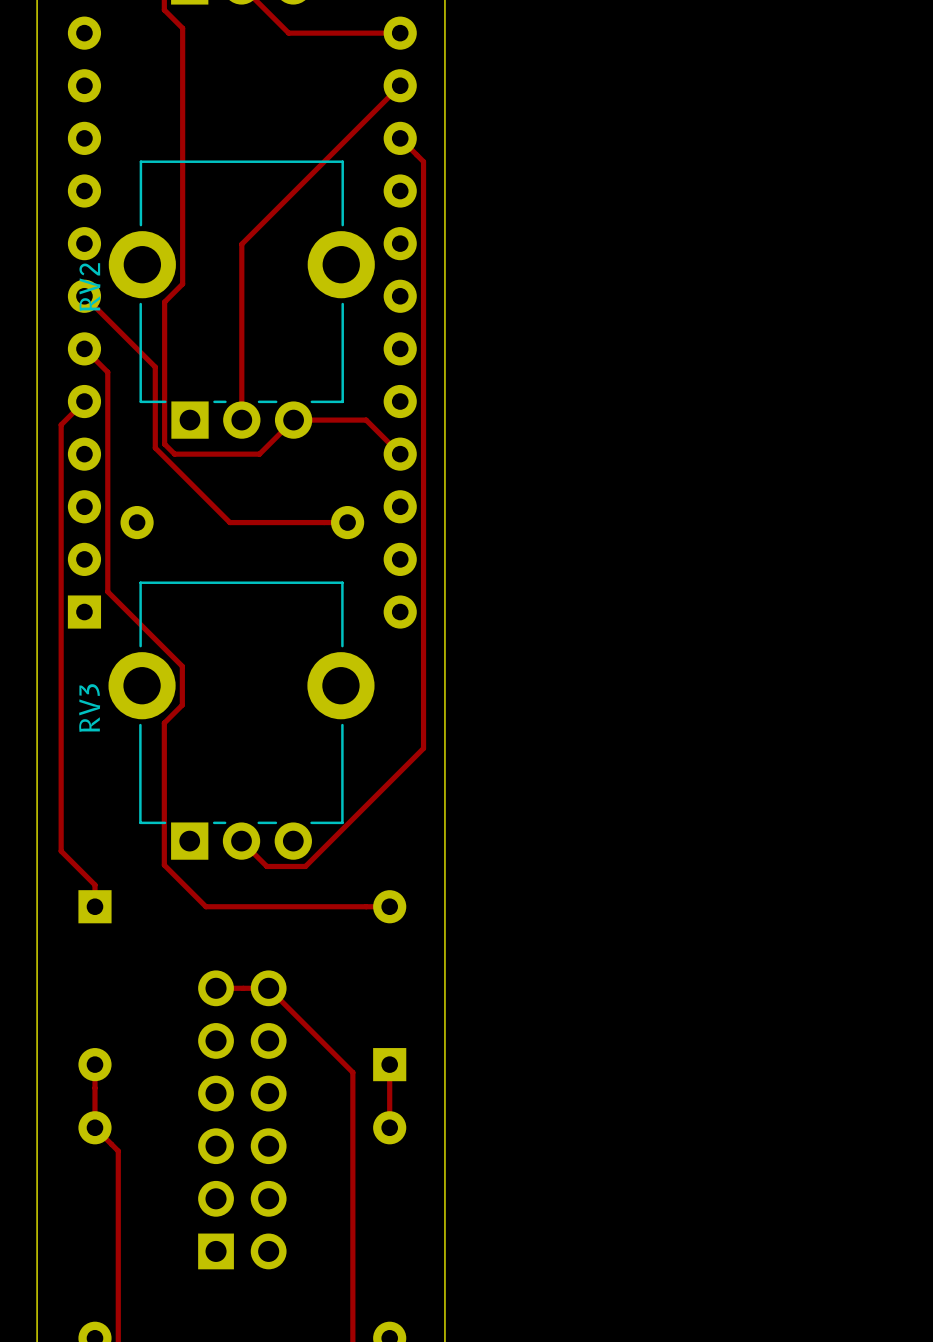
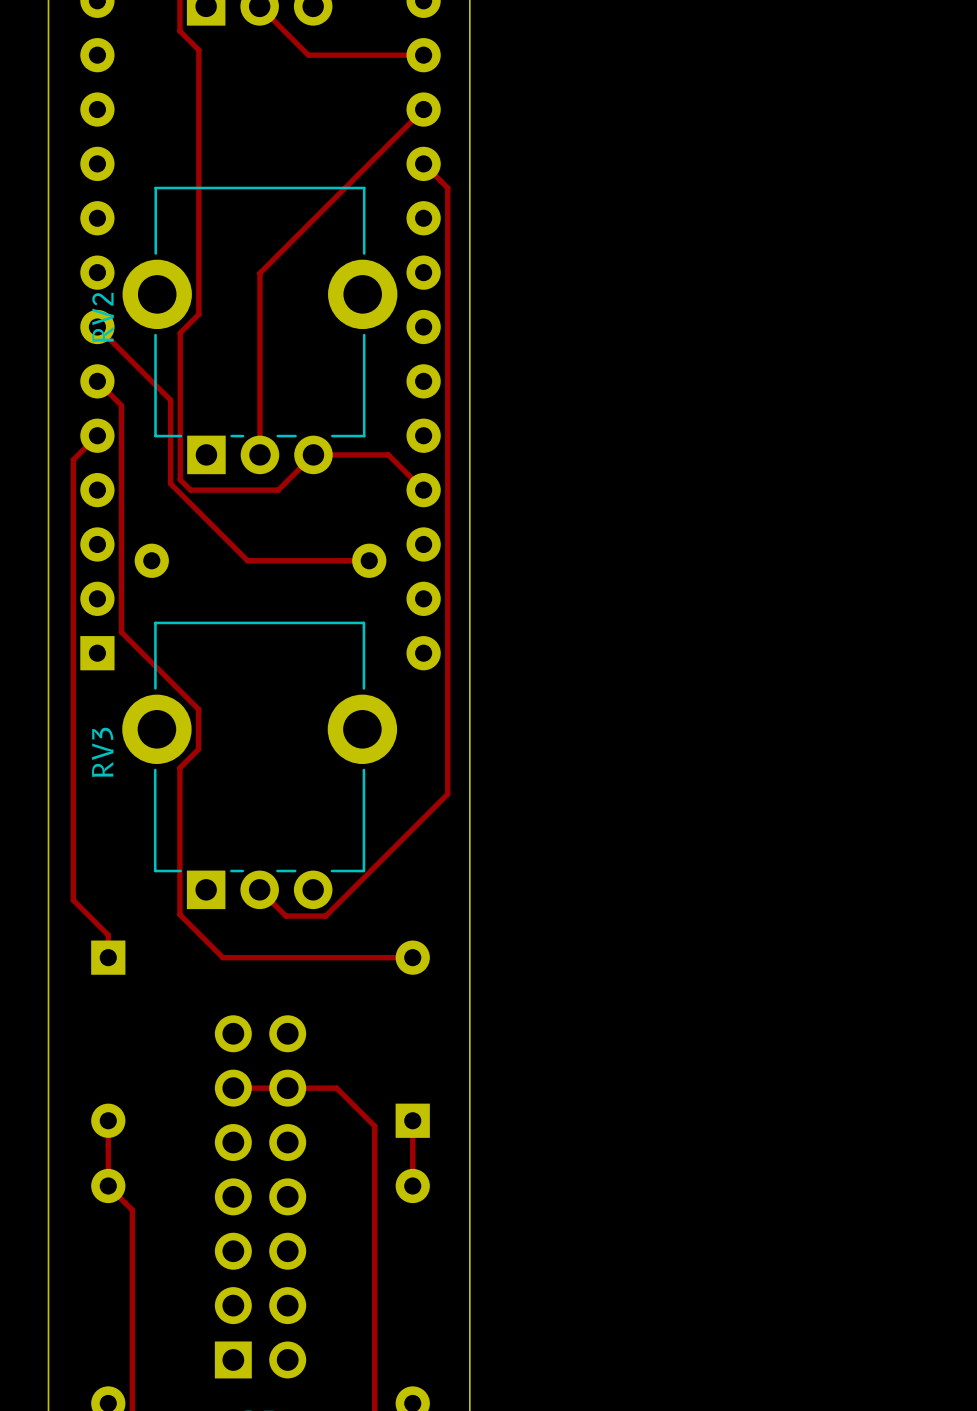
part footprint: [198, 970, 287, 1270] -> [214, 1015, 307, 1379]
track: (216, 988) (268, 988) (352, 1072) -> (233, 1088) (336, 1088) (374, 1126) (374, 1128)

